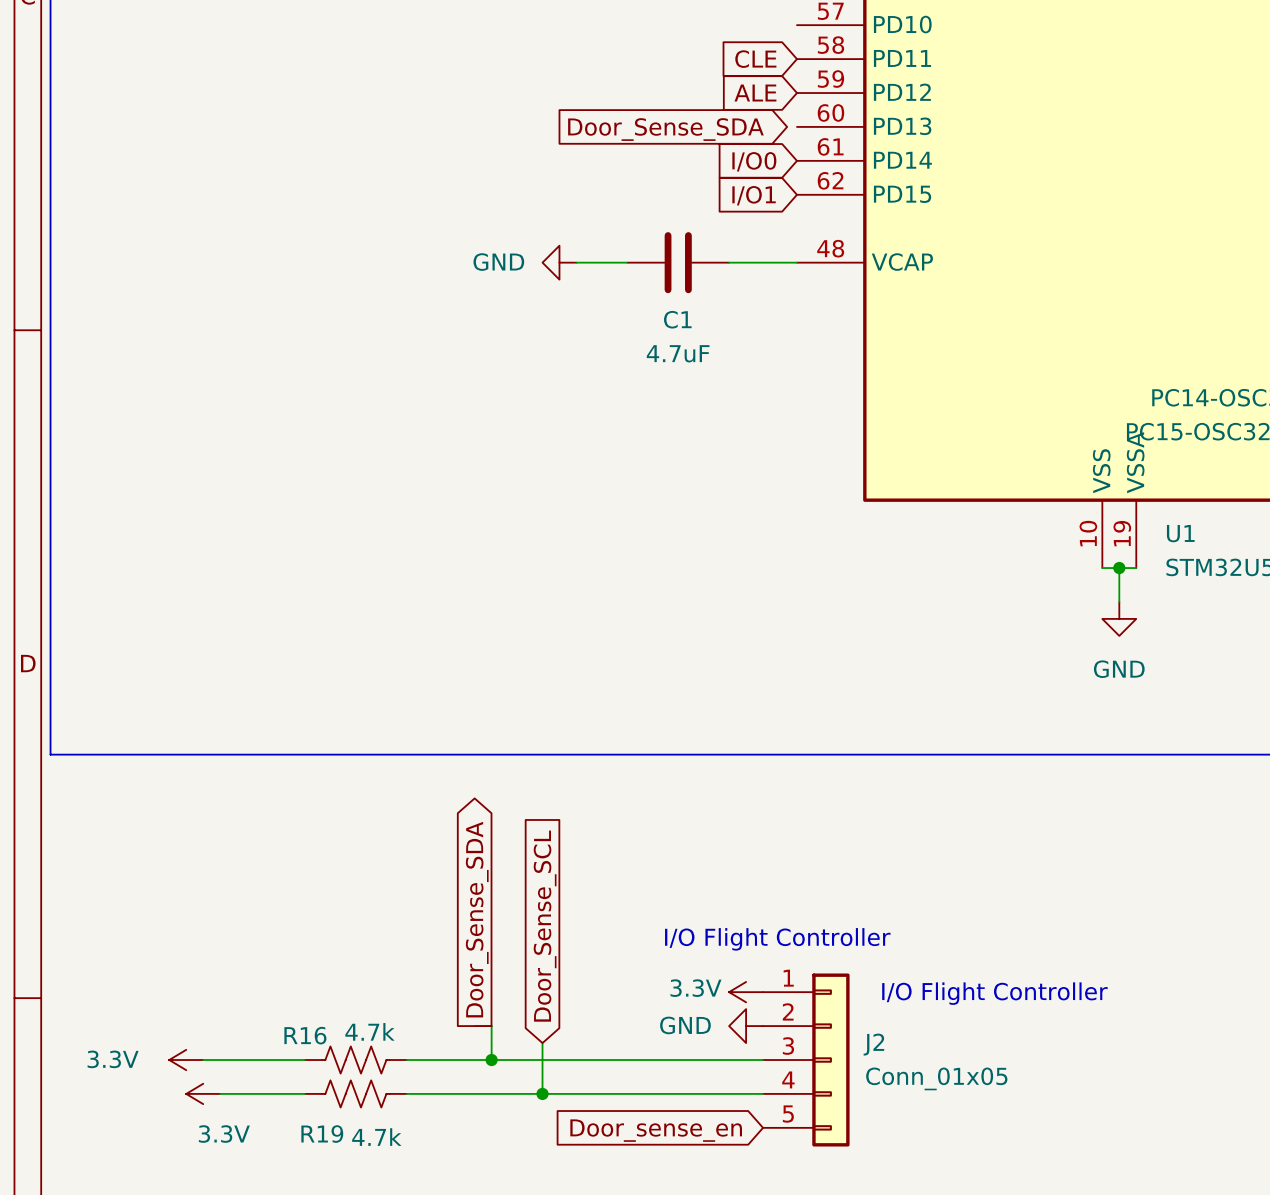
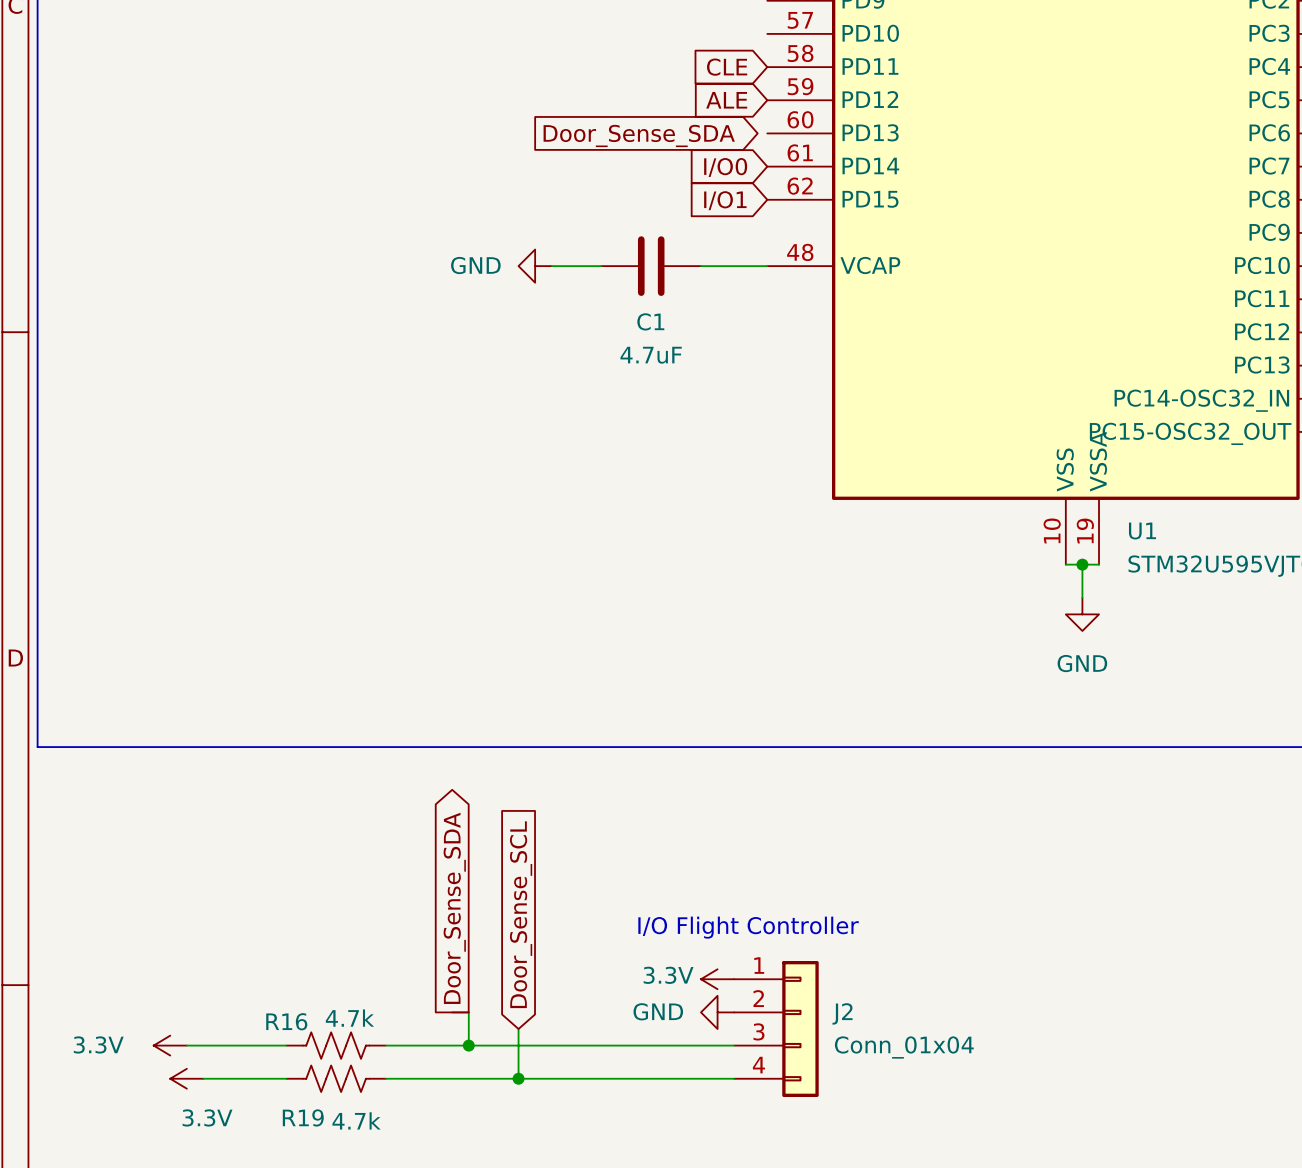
J2 symbol: [763, 973, 850, 1147] -> [734, 961, 819, 1097]
text: I/O Flight Controller (994, 993) -> none
J2 value: Conn_01x05 (936, 1078) -> Conn_01x04 (904, 1047)
global label: Door_sense_en (656, 1130) -> none

